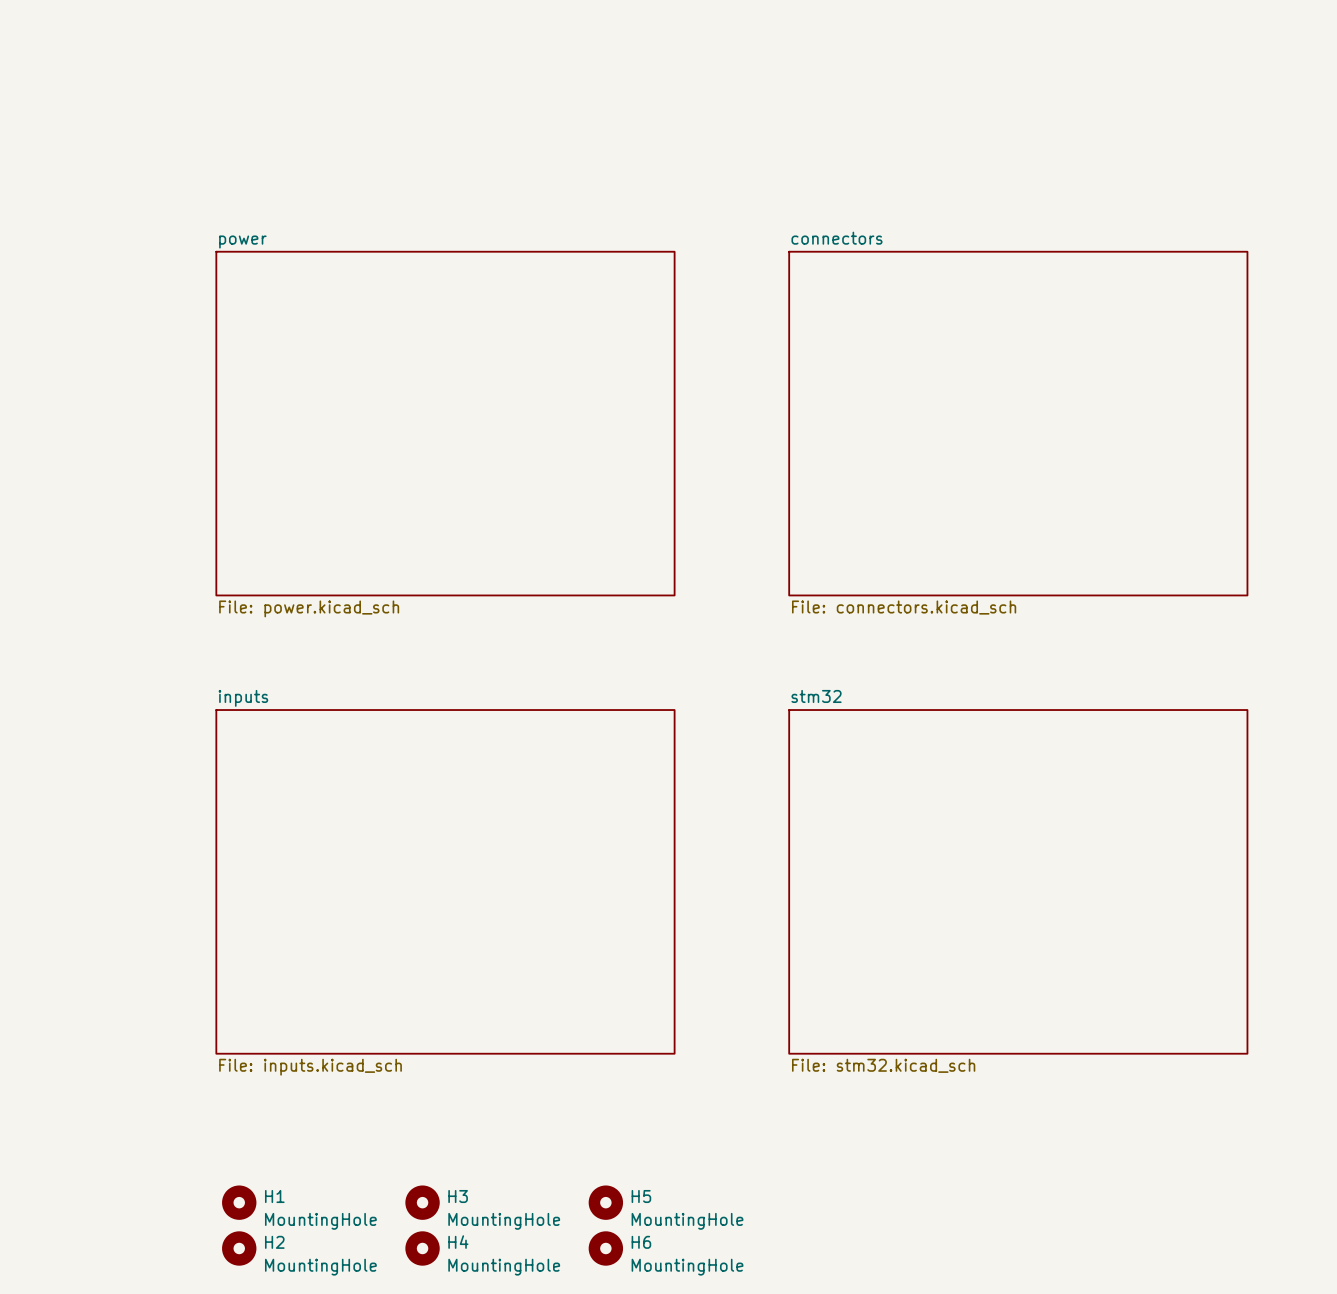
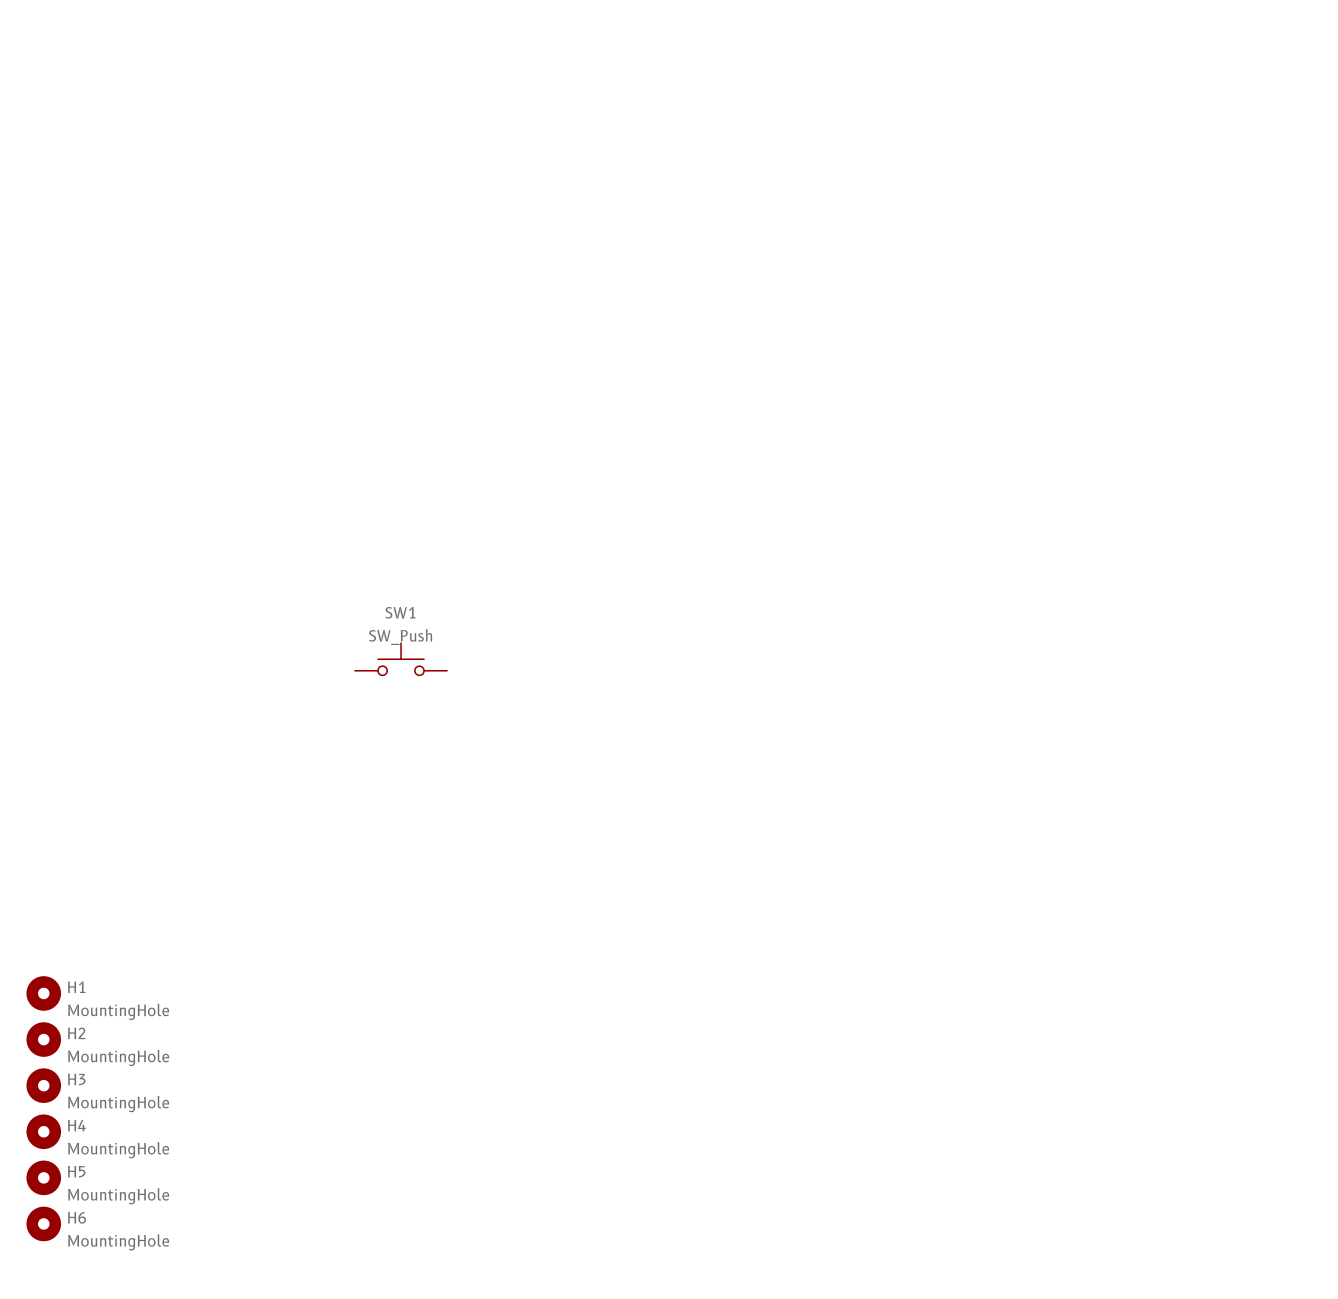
sheet power: File: power.kicad_sch (445, 423) -> none
sheet connectors: File: connectors.kicad_sch (1018, 423) -> none
SW1: none -> SW_Push (401, 659)
sheet inputs: File: inputs.kicad_sch (445, 881) -> none
sheet stm32: File: stm32.kicad_sch (1018, 881) -> none
H1 position: (239, 1202) -> (43, 993)
H3 position: (422, 1202) -> (43, 1085)
H5 position: (605, 1202) -> (43, 1177)
H2 position: (239, 1248) -> (43, 1039)
H4 position: (422, 1248) -> (43, 1131)
H6 position: (605, 1248) -> (43, 1223)

